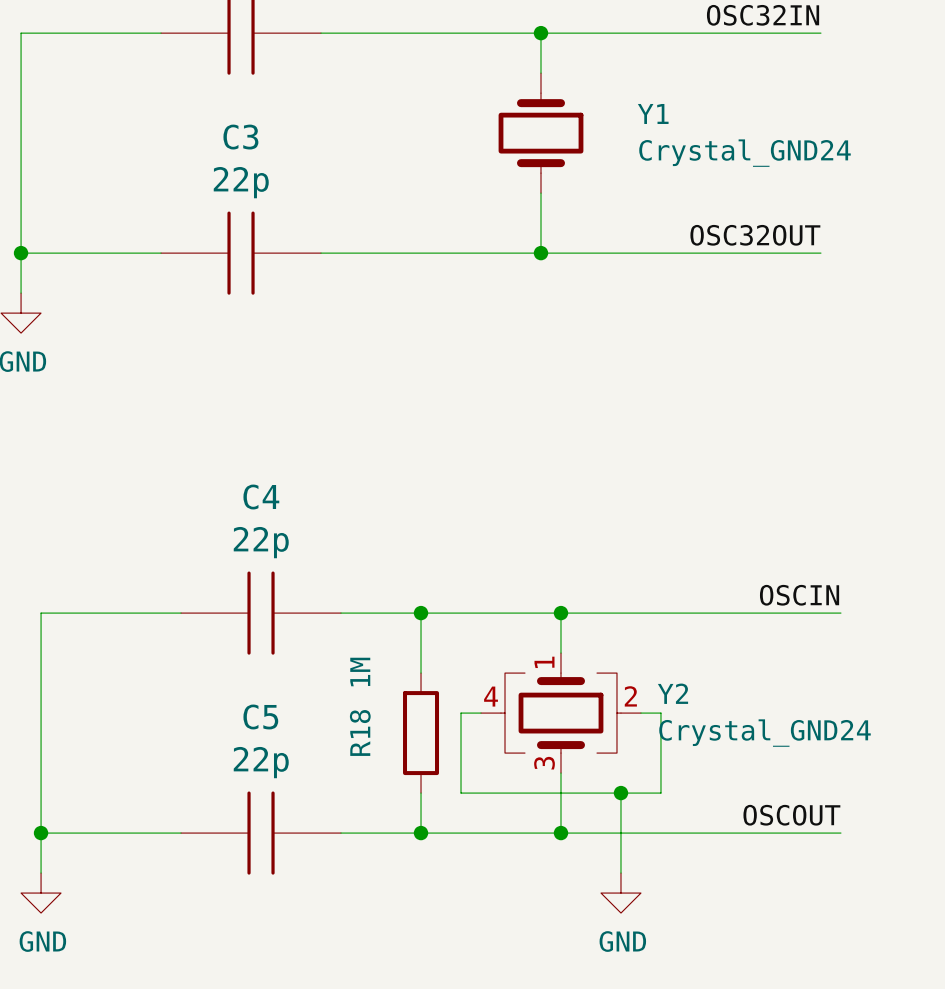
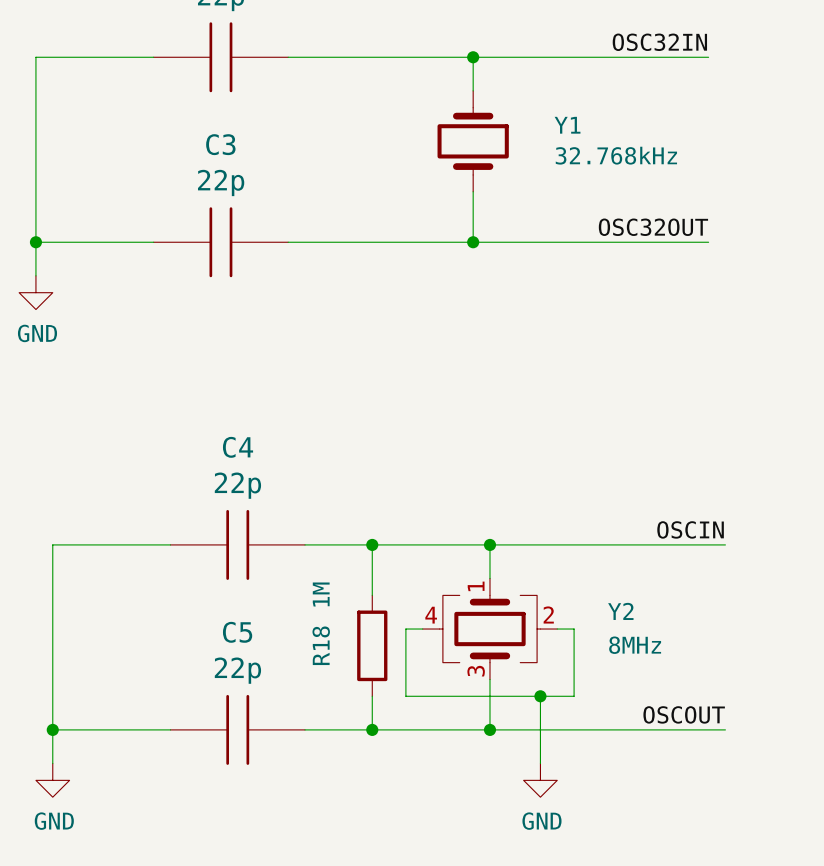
Y1 value: Crystal_GND24 (745, 153) -> 32.768kHz (616, 155)
Y2 name position: Y2 (672, 693) -> Y2 (620, 611)
Y2 value: Crystal_GND24 (765, 733) -> 8MHz (635, 645)

